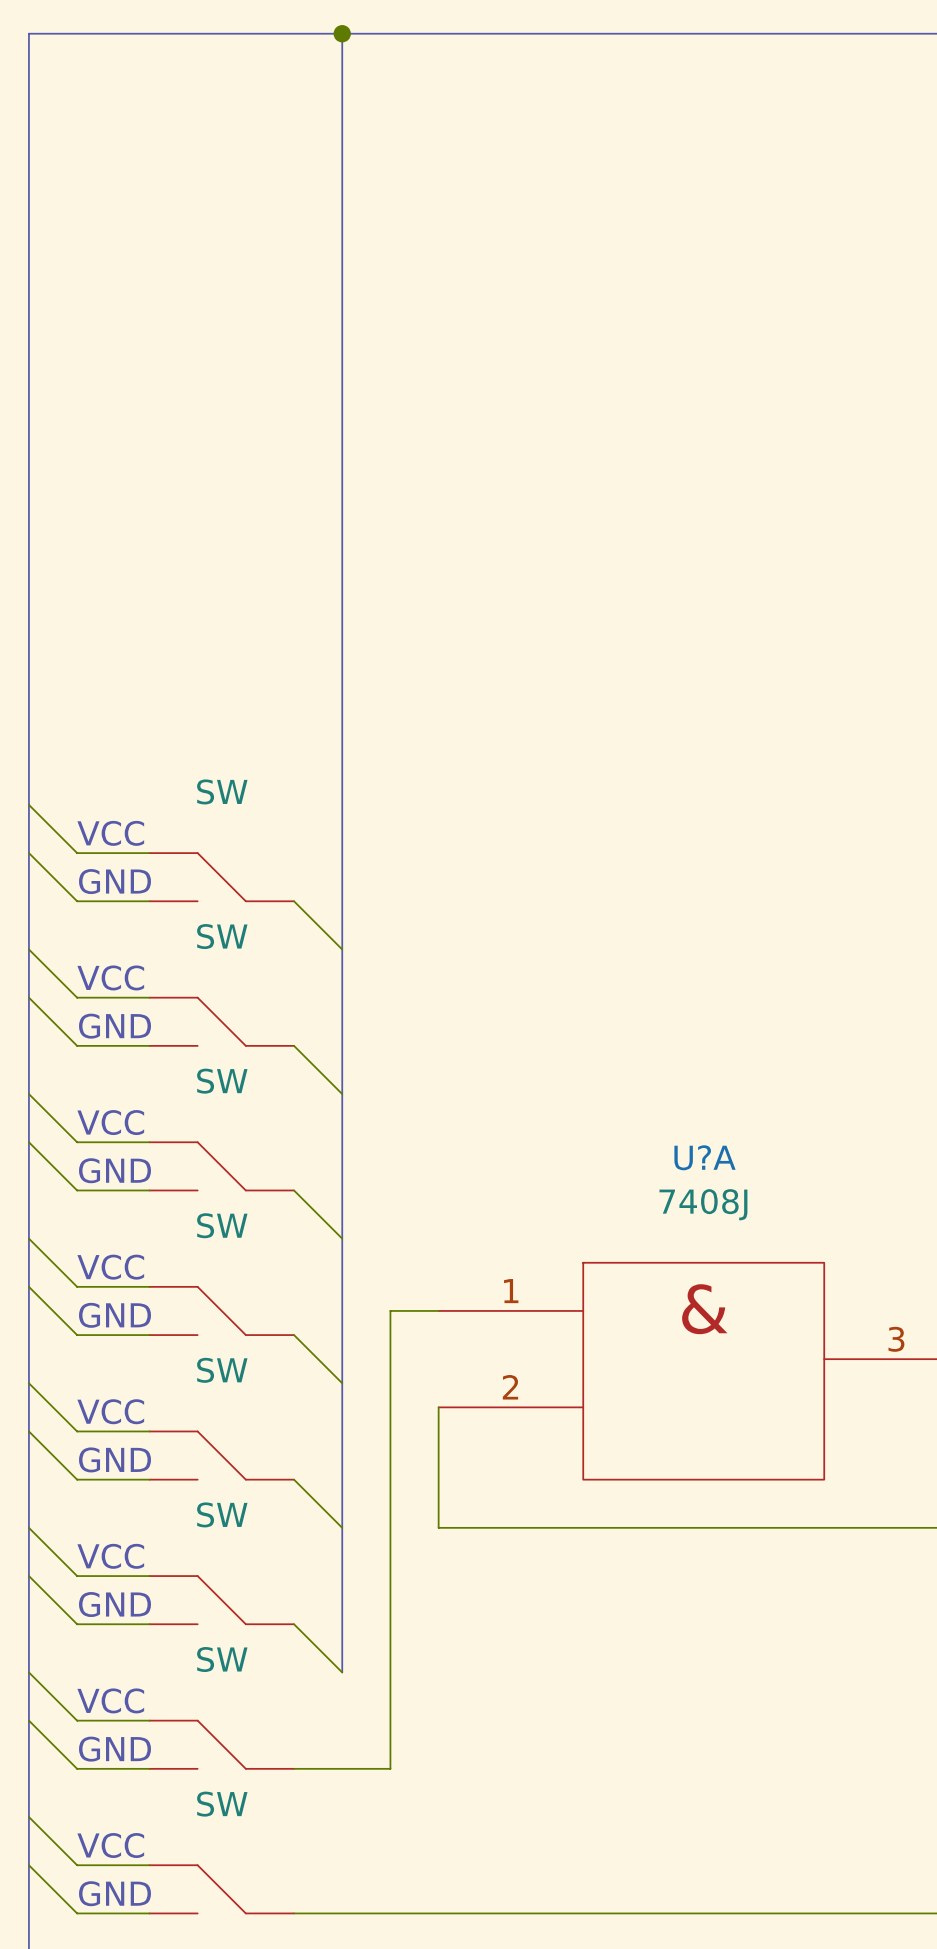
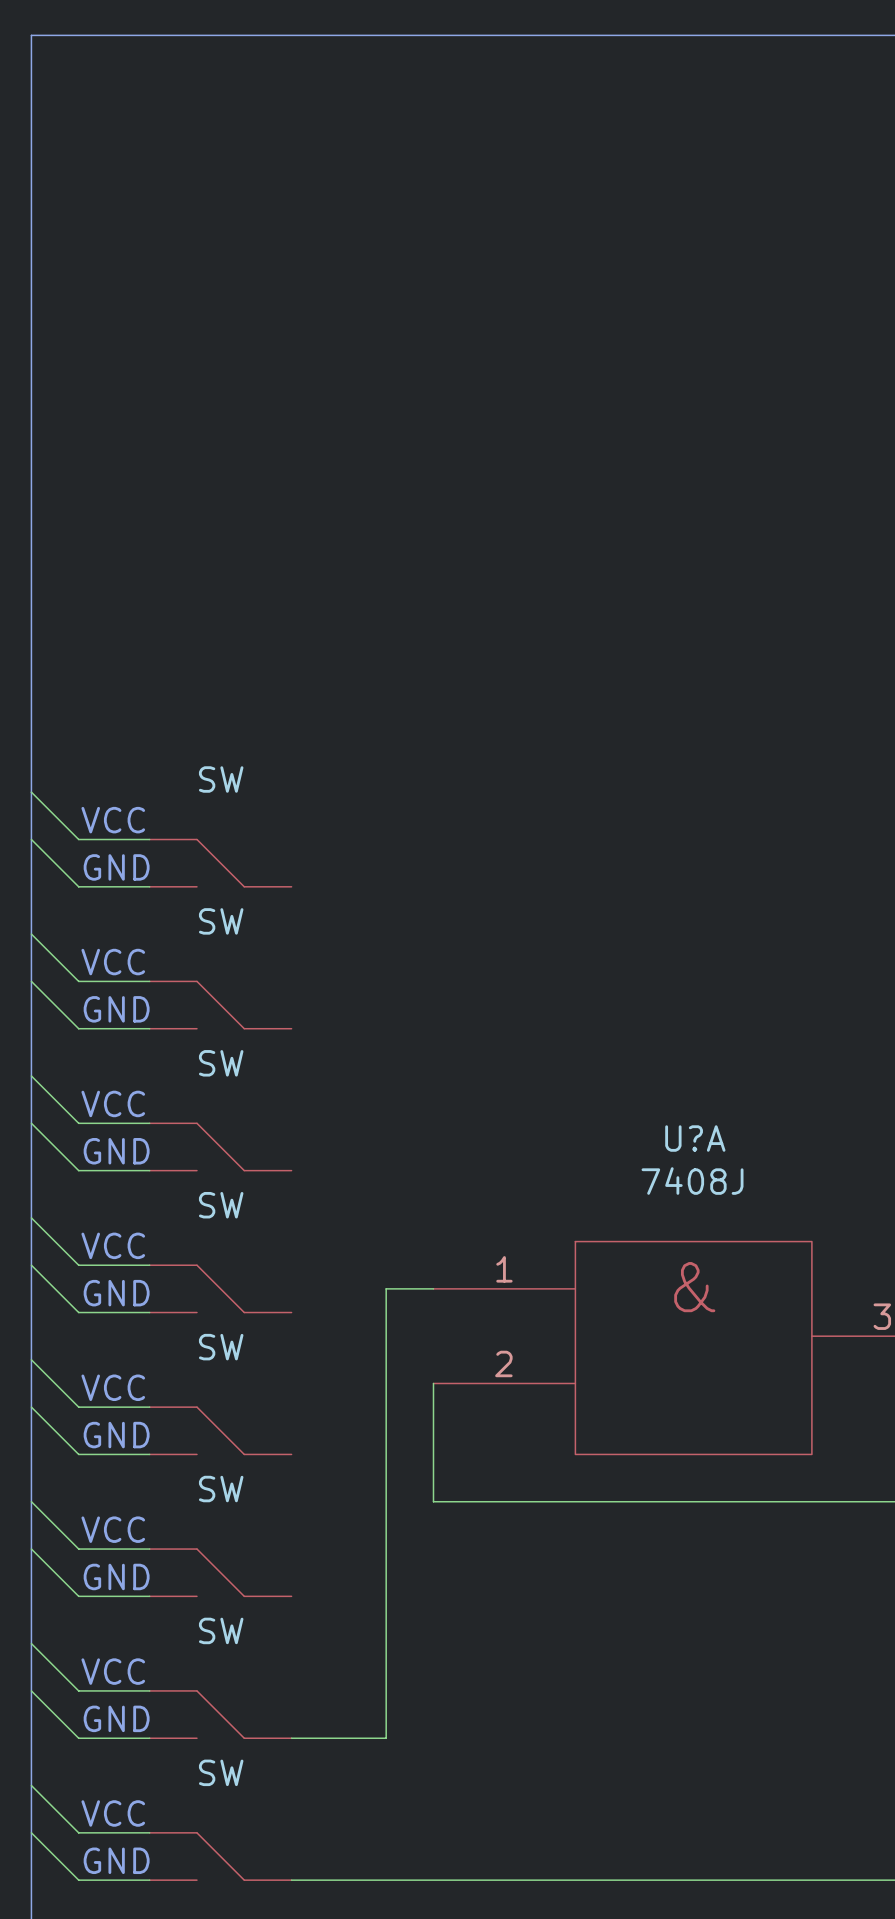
bus: (342, 33) (342, 1672) -> none
junction: (342, 33) -> none
wire: (294, 901) (342, 949) -> none
wire: (294, 1045) (342, 1094) -> none
wire: (294, 1190) (342, 1238) -> none
wire: (294, 1335) (342, 1383) -> none
wire: (294, 1479) (342, 1527) -> none
wire: (294, 1624) (342, 1672) -> none

